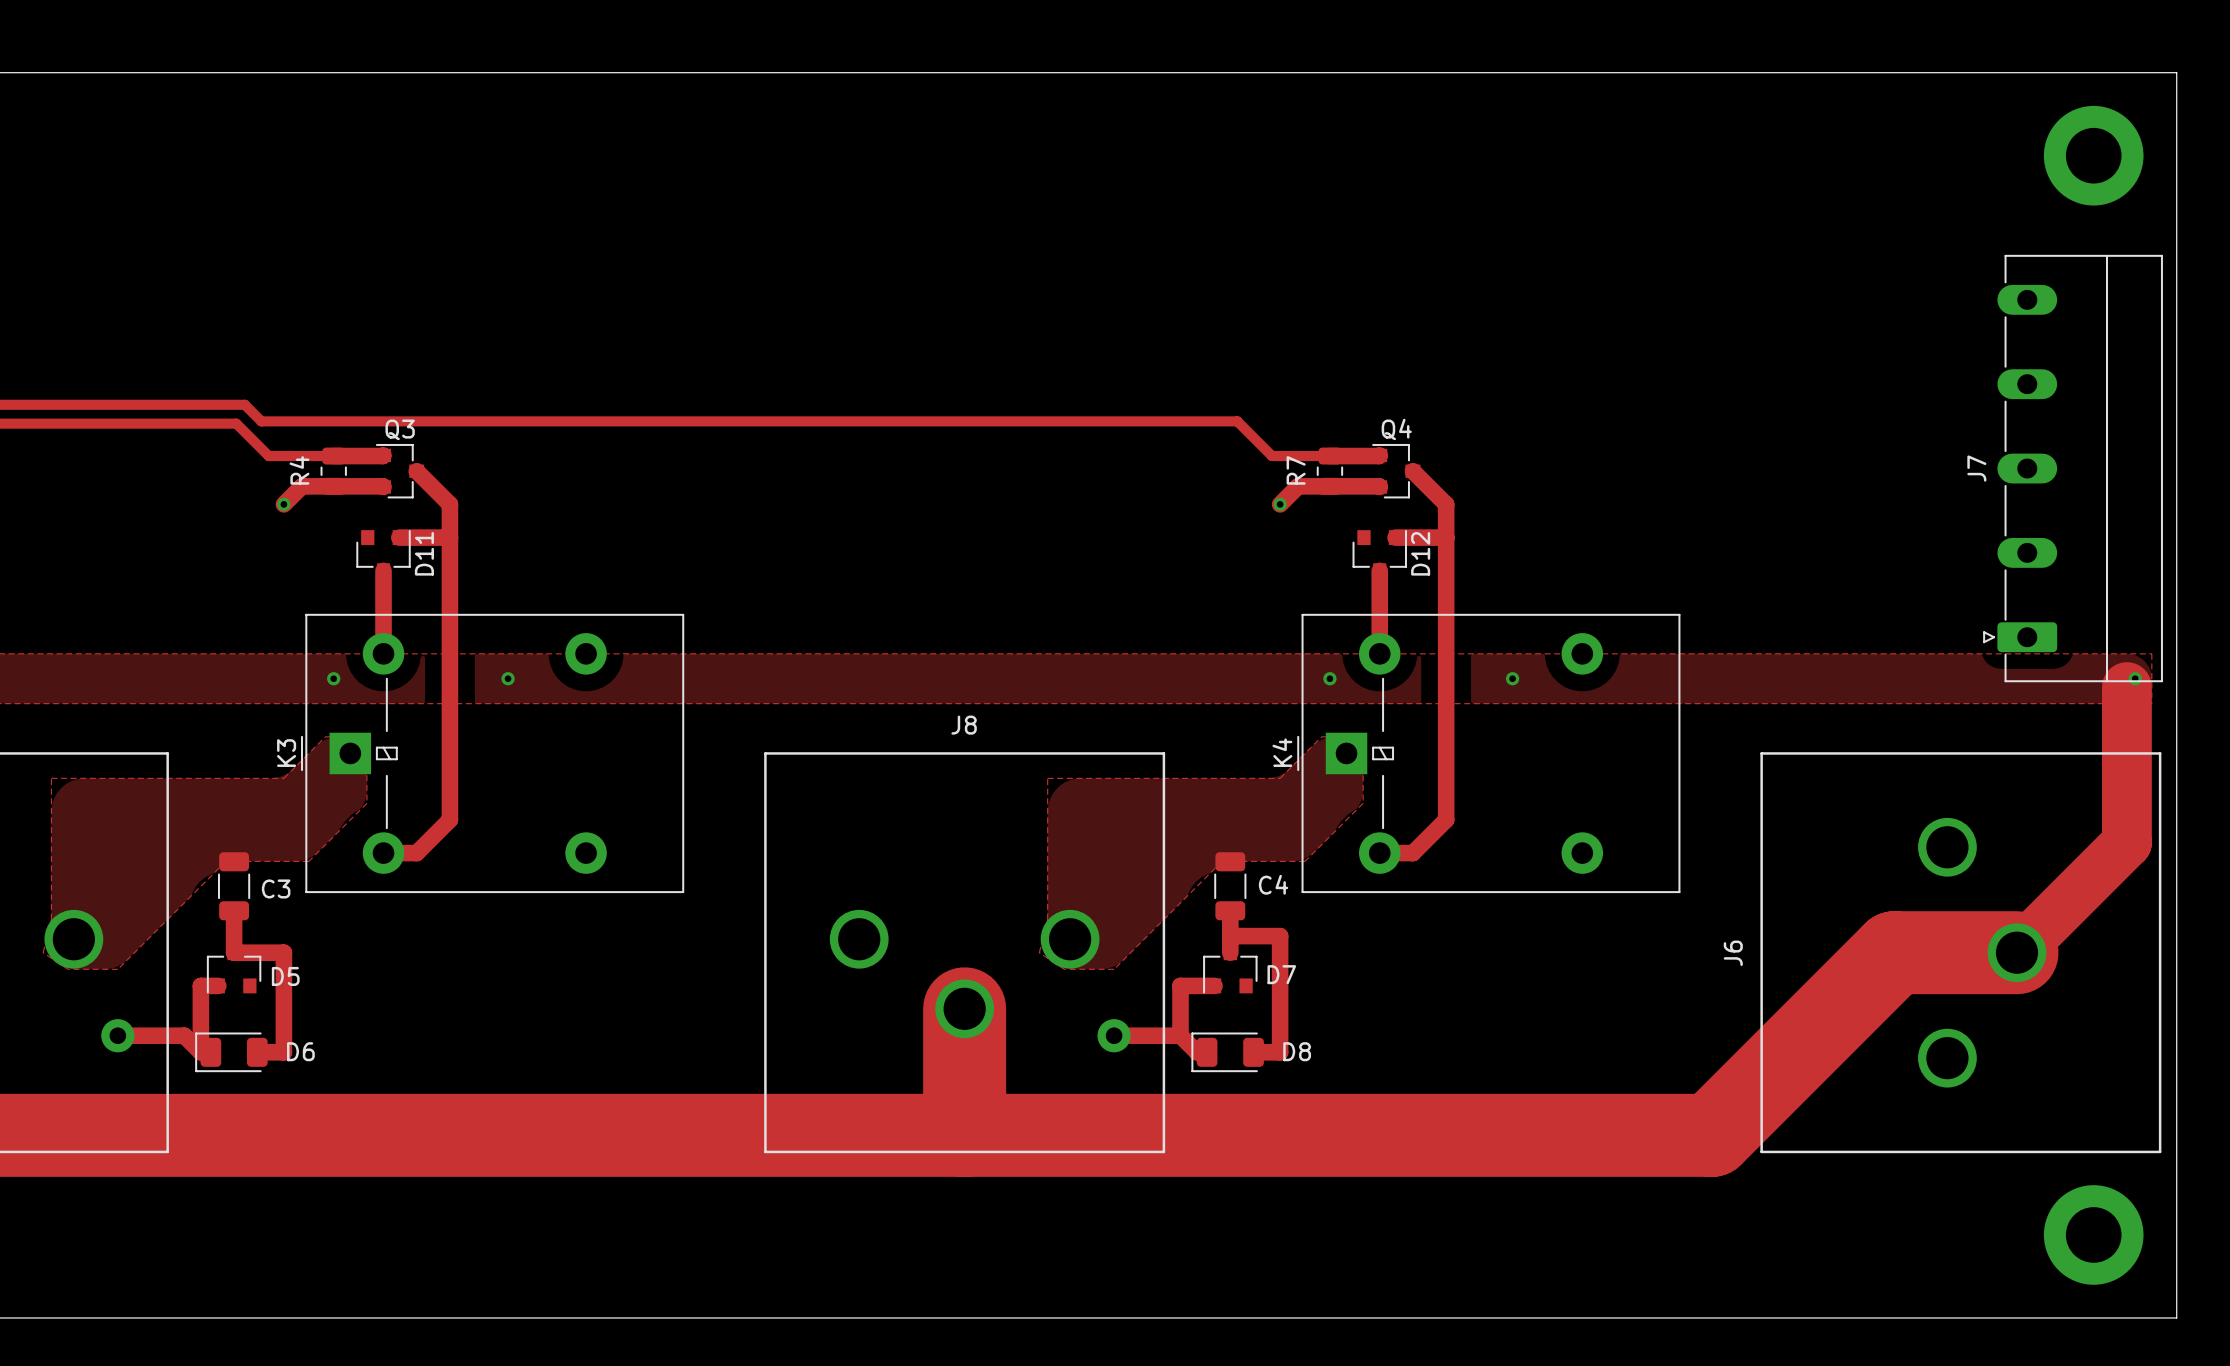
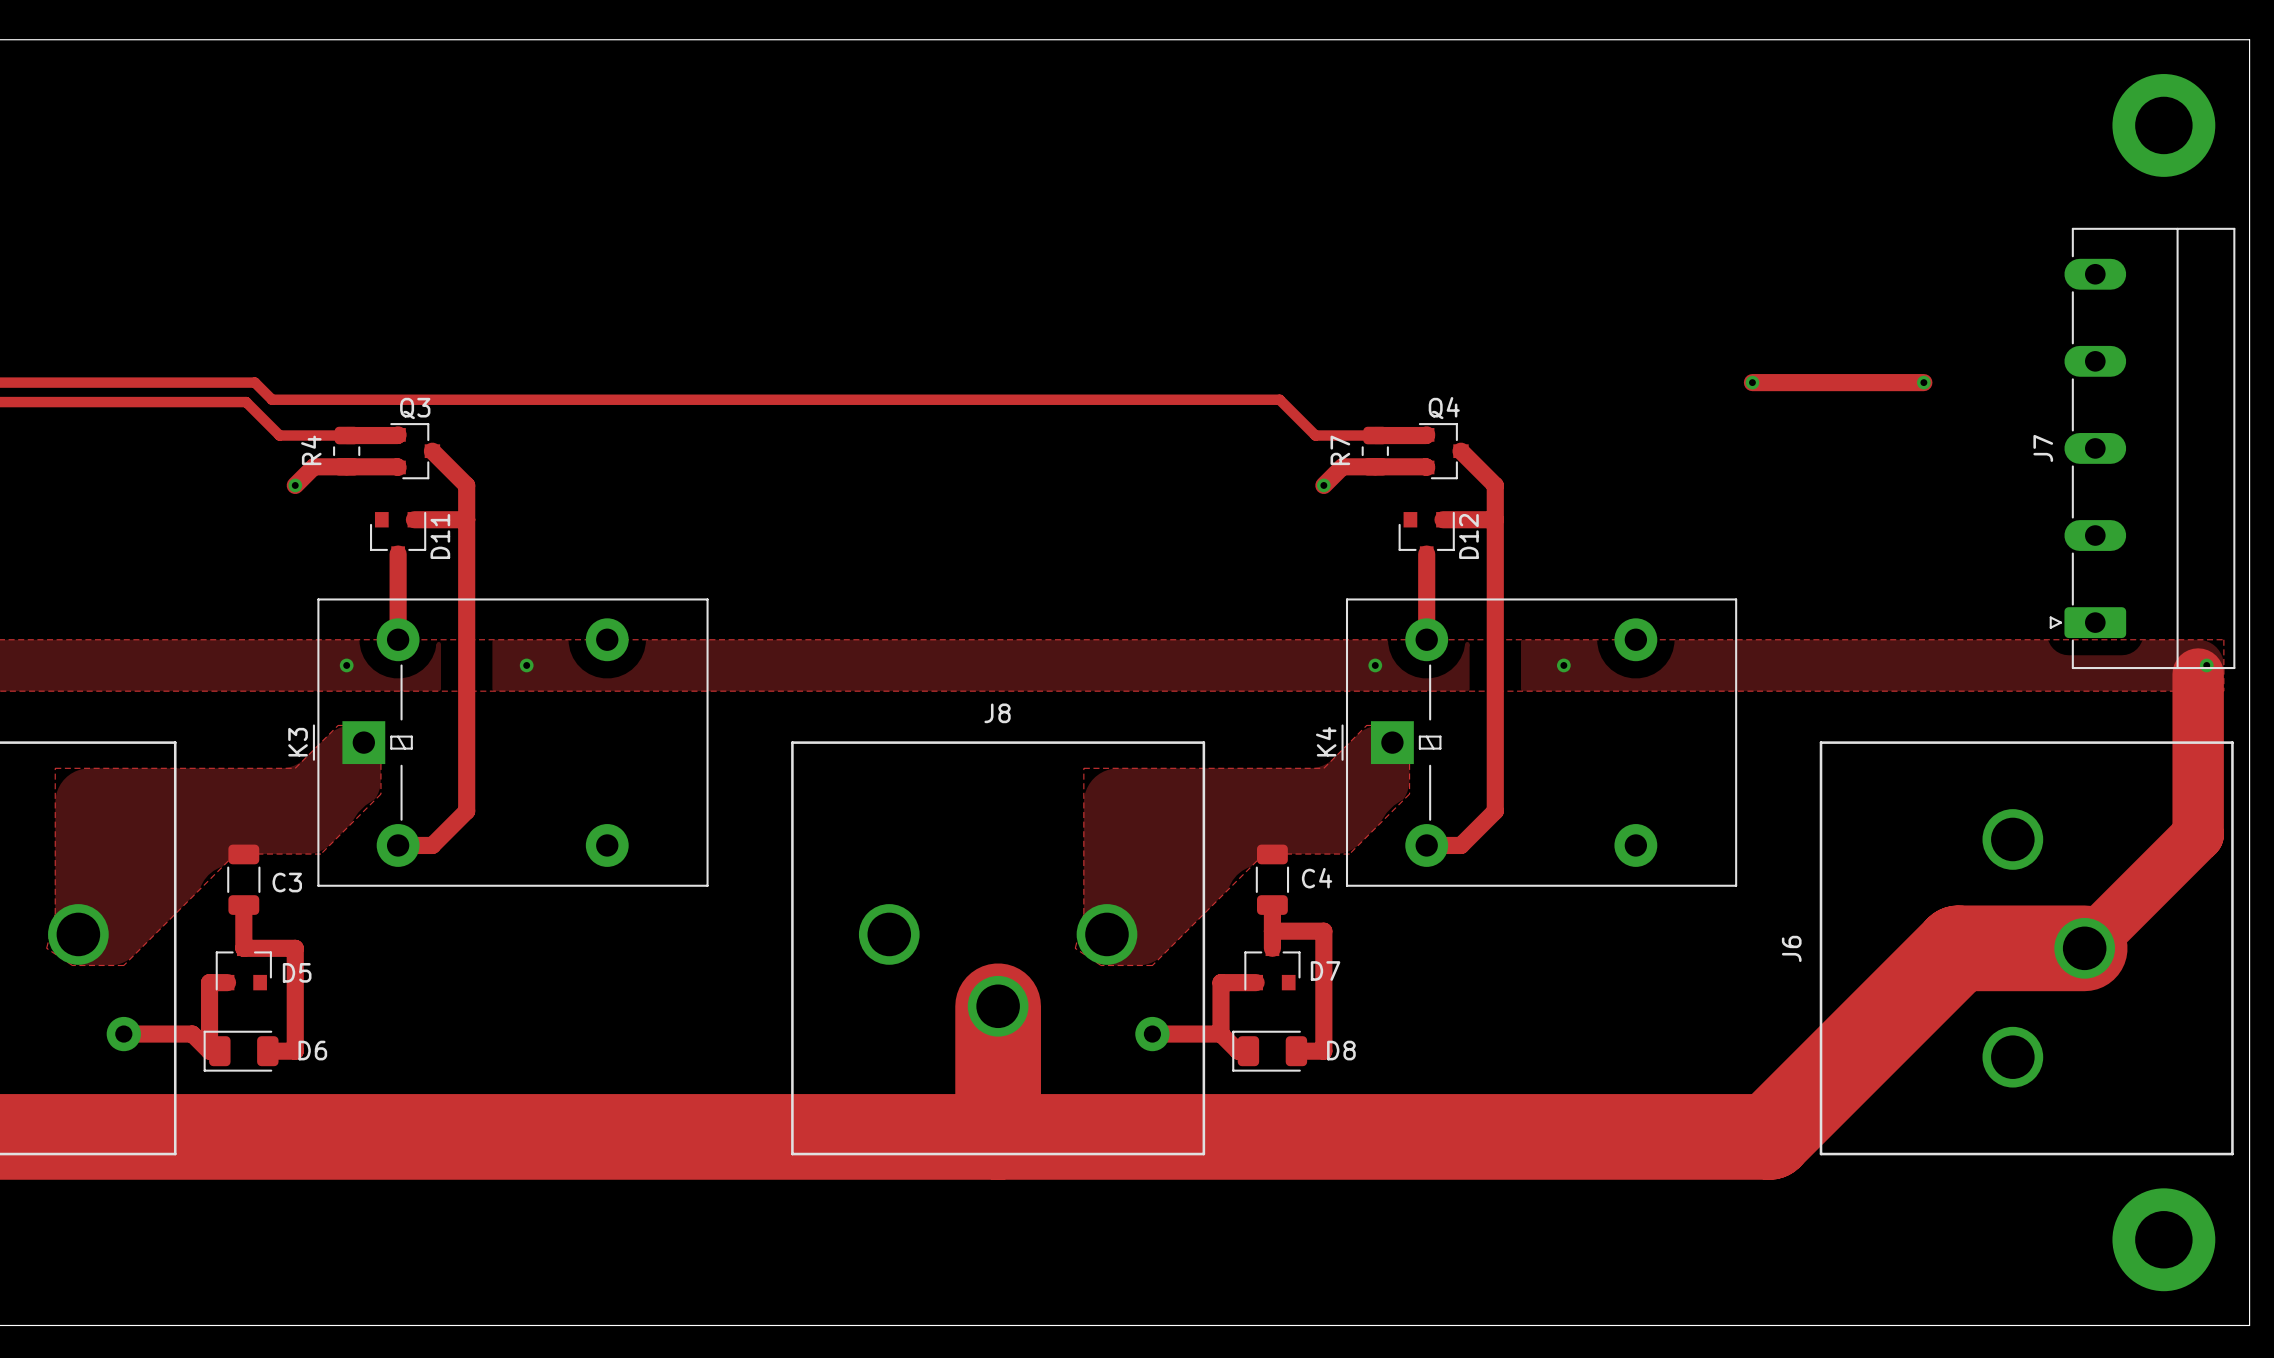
track: none -> (1752, 382) (1923, 382)
via: none -> (1752, 382)
via: none -> (1923, 382)

